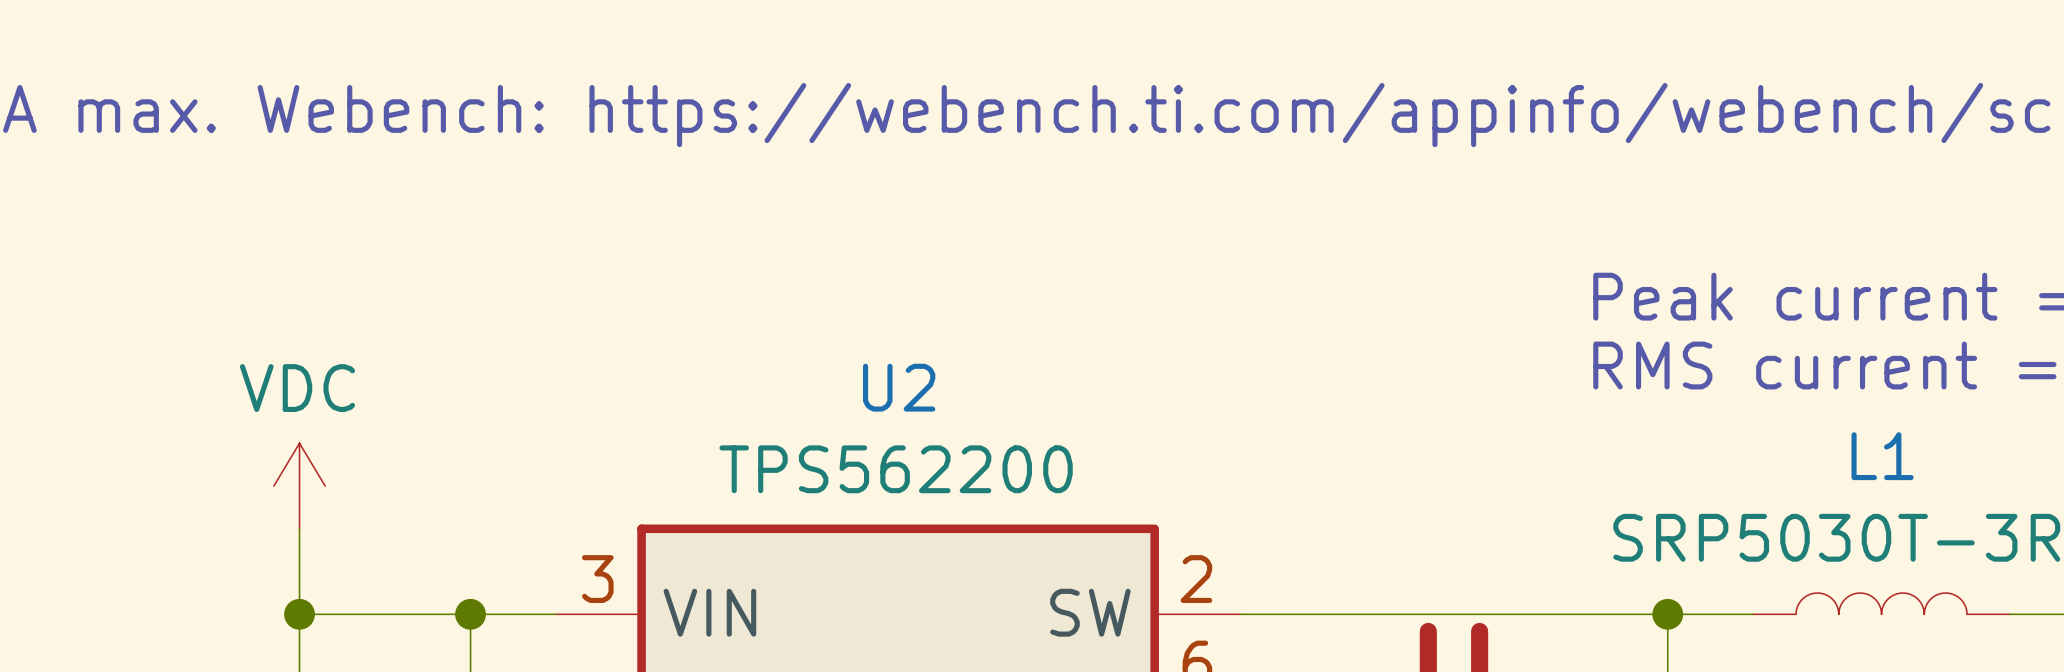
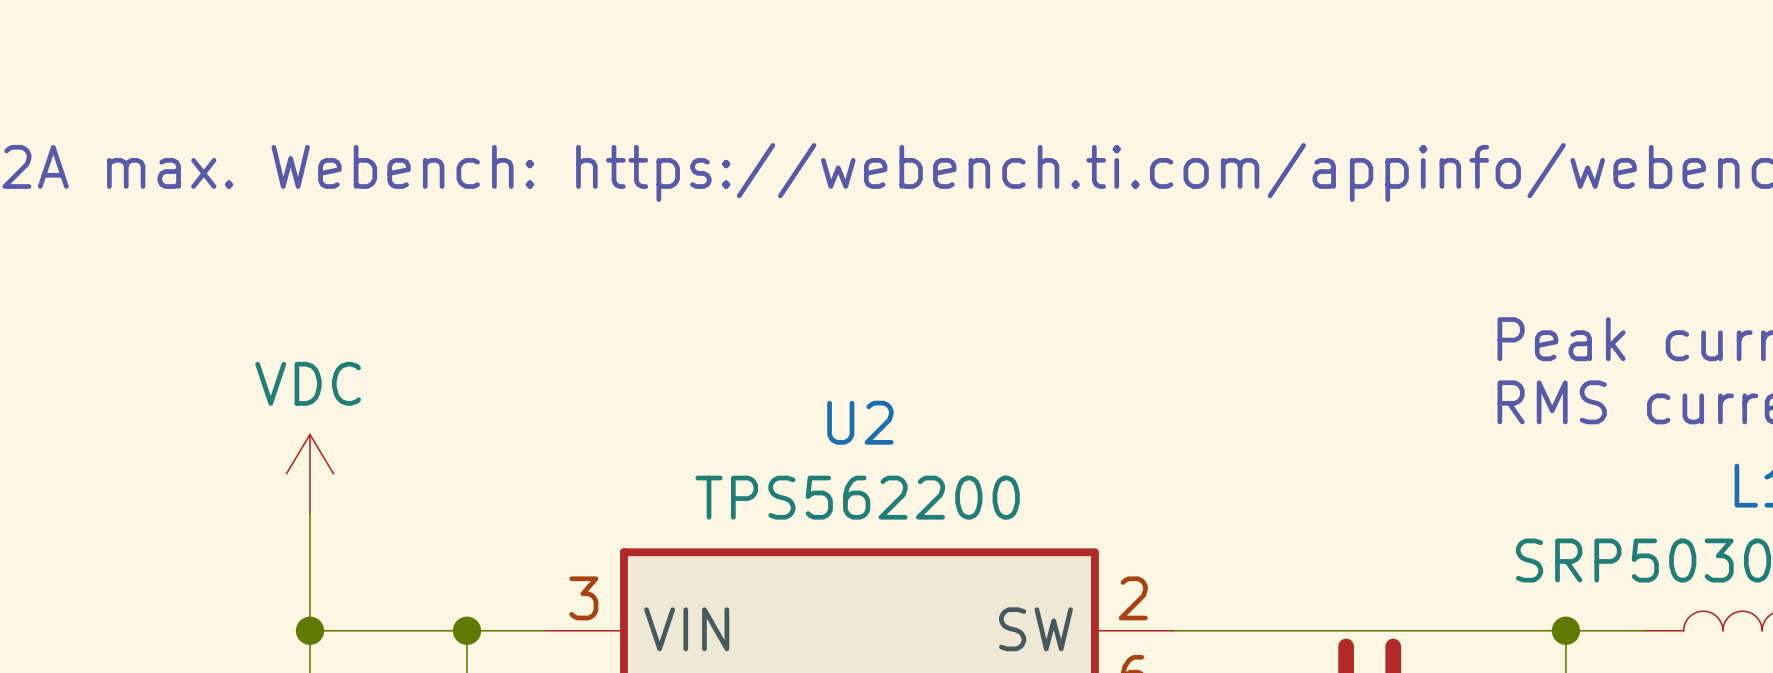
power symbol position: VDC (299, 486) -> VDC (310, 473)

